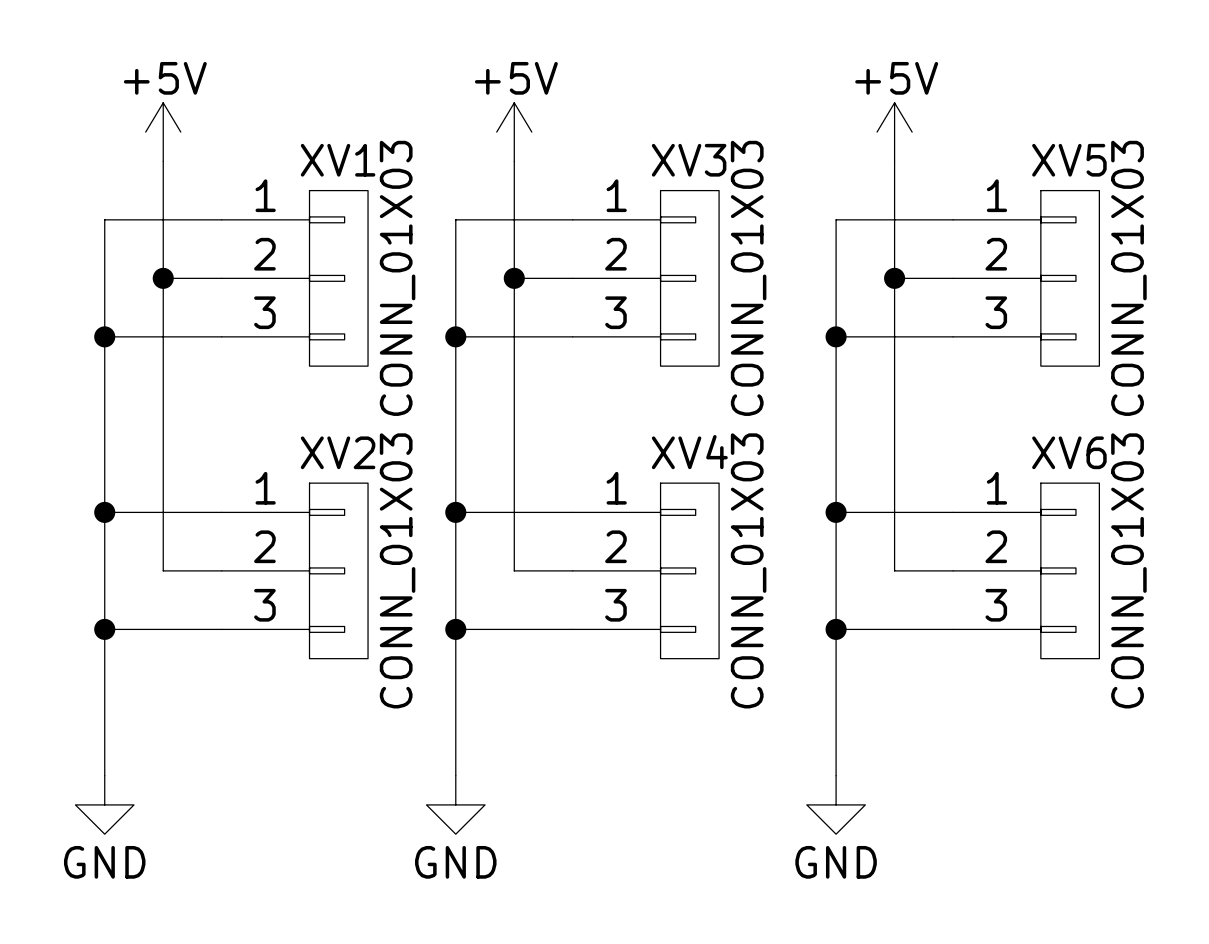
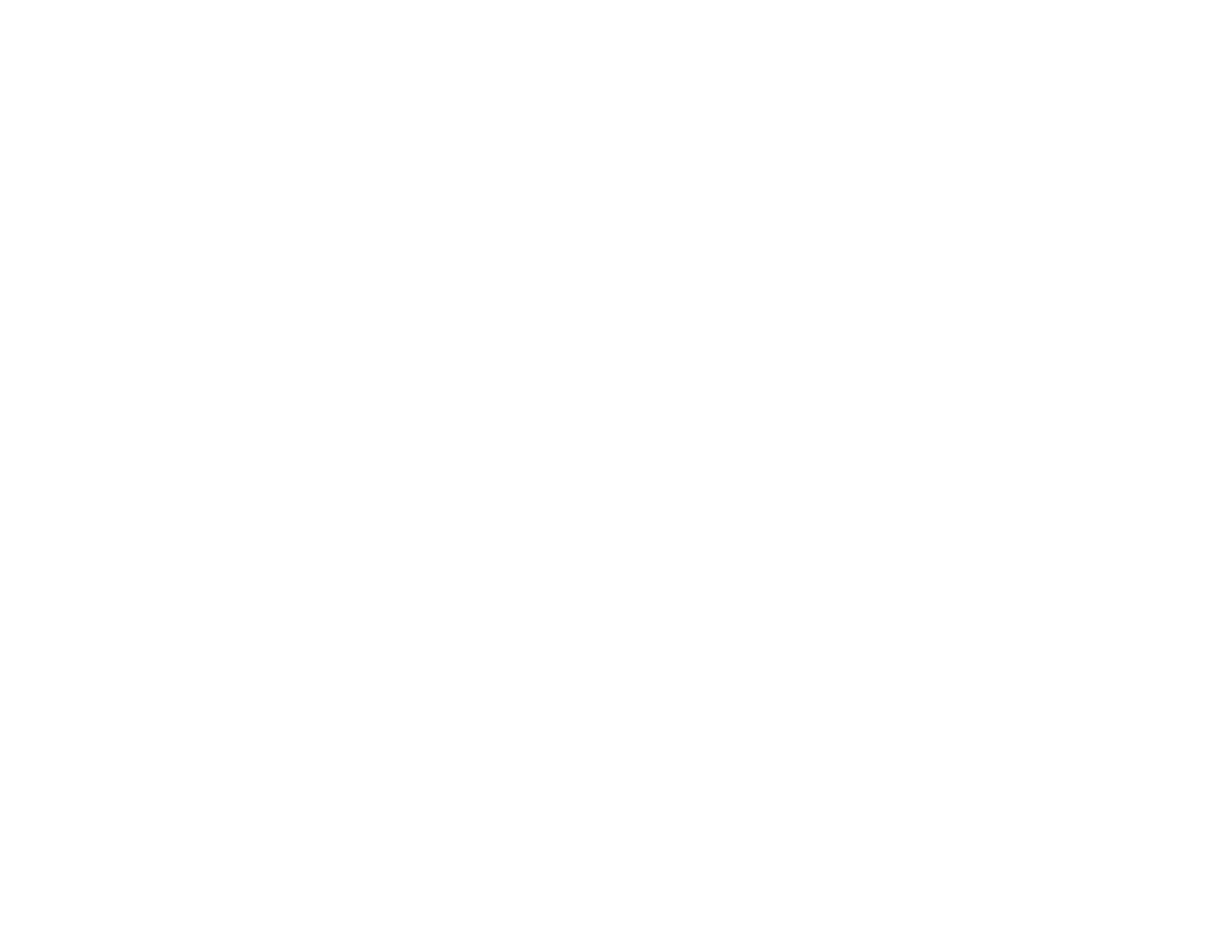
power symbol: +5V (163, 132) -> none
power symbol: +5V (514, 132) -> none
power symbol: +5V (894, 132) -> none
wire: (163, 161) (163, 570) (221, 570) -> none
wire: (514, 161) (514, 570) (572, 570) -> none
wire: (894, 161) (894, 570) (953, 570) -> none
wire: (221, 219) (104, 219) (104, 775) -> none
wire: (572, 219) (455, 219) (455, 775) -> none
wire: (953, 219) (836, 219) (836, 775) -> none
wire: (163, 278) (221, 278) -> none
junction: (163, 278) -> none
XV1: CONN_01X03 (294, 278) -> none
wire: (514, 278) (572, 278) -> none
junction: (514, 278) -> none
XV3: CONN_01X03 (645, 278) -> none
wire: (894, 278) (953, 278) -> none
junction: (894, 278) -> none
XV5: CONN_01X03 (1026, 278) -> none
wire: (104, 336) (221, 336) -> none
junction: (104, 336) -> none
wire: (455, 336) (572, 336) -> none
junction: (455, 336) -> none
wire: (836, 336) (953, 336) -> none
junction: (836, 336) -> none
wire: (104, 512) (221, 512) -> none
junction: (104, 512) -> none
wire: (455, 512) (572, 512) -> none
junction: (455, 512) -> none
wire: (836, 512) (953, 512) -> none
junction: (836, 512) -> none
XV2: CONN_01X03 (294, 570) -> none
XV4: CONN_01X03 (645, 570) -> none
XV6: CONN_01X03 (1026, 570) -> none
wire: (104, 629) (221, 629) -> none
junction: (104, 629) -> none
wire: (455, 629) (572, 629) -> none
junction: (455, 629) -> none
wire: (836, 629) (953, 629) -> none
junction: (836, 629) -> none
power symbol: GND (104, 804) -> none
power symbol: GND (455, 804) -> none
power symbol: GND (836, 804) -> none

